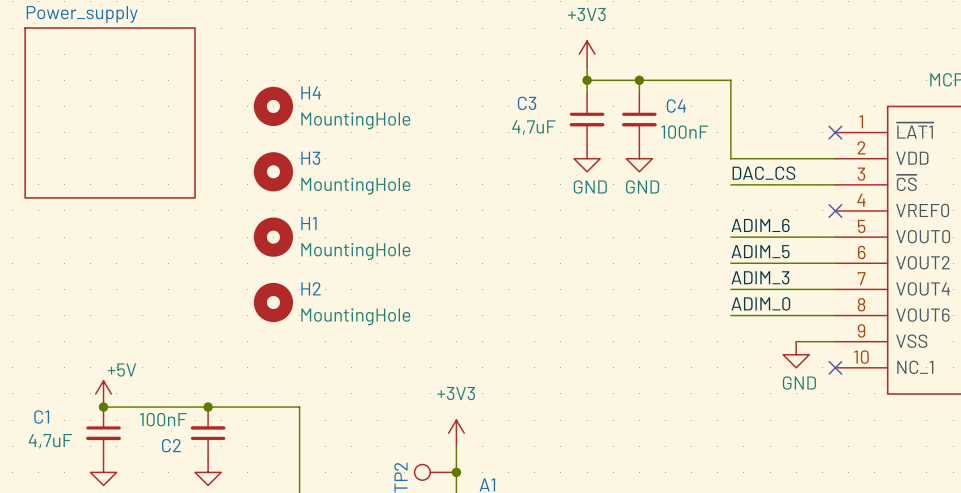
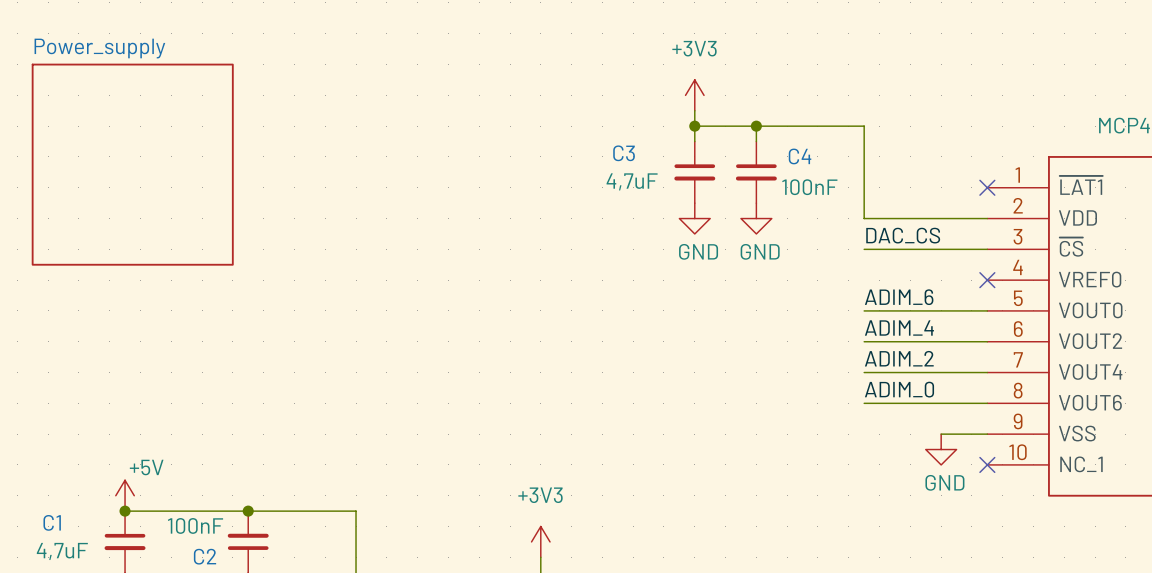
H4: MountingHole (273, 106) -> none
H3: MountingHole (273, 171) -> none
H1: MountingHole (273, 237) -> none
label: ADIM_5 (760, 251) -> ADIM_4 (899, 328)
label: ADIM_3 (760, 277) -> ADIM_2 (899, 358)
H2: MountingHole (273, 302) -> none

